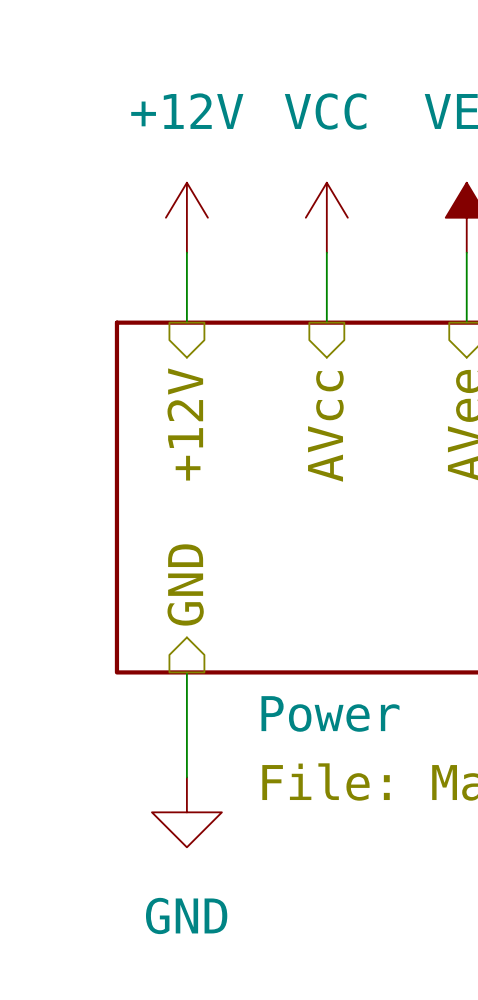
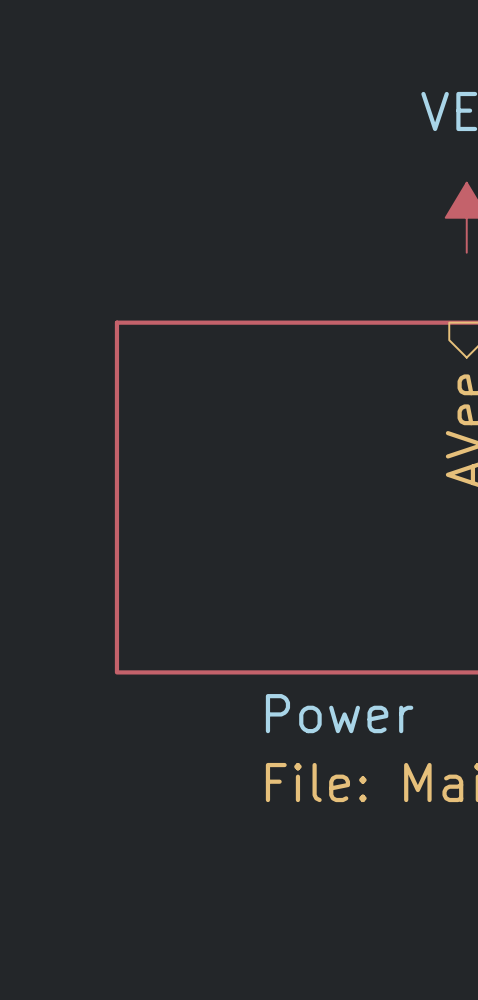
power symbol: +12V (186, 217) -> none
power symbol: VCC (326, 217) -> none
wire: (186, 252) (186, 322) -> none
wire: (326, 252) (326, 322) -> none
wire: (466, 252) (466, 322) -> none
hierarchical label: +12V (185, 424) -> none
hierarchical label: AVcc (325, 426) -> none
hierarchical label: GND (185, 584) -> none
wire: (186, 672) (186, 777) -> none
power symbol: GND (186, 812) -> none

